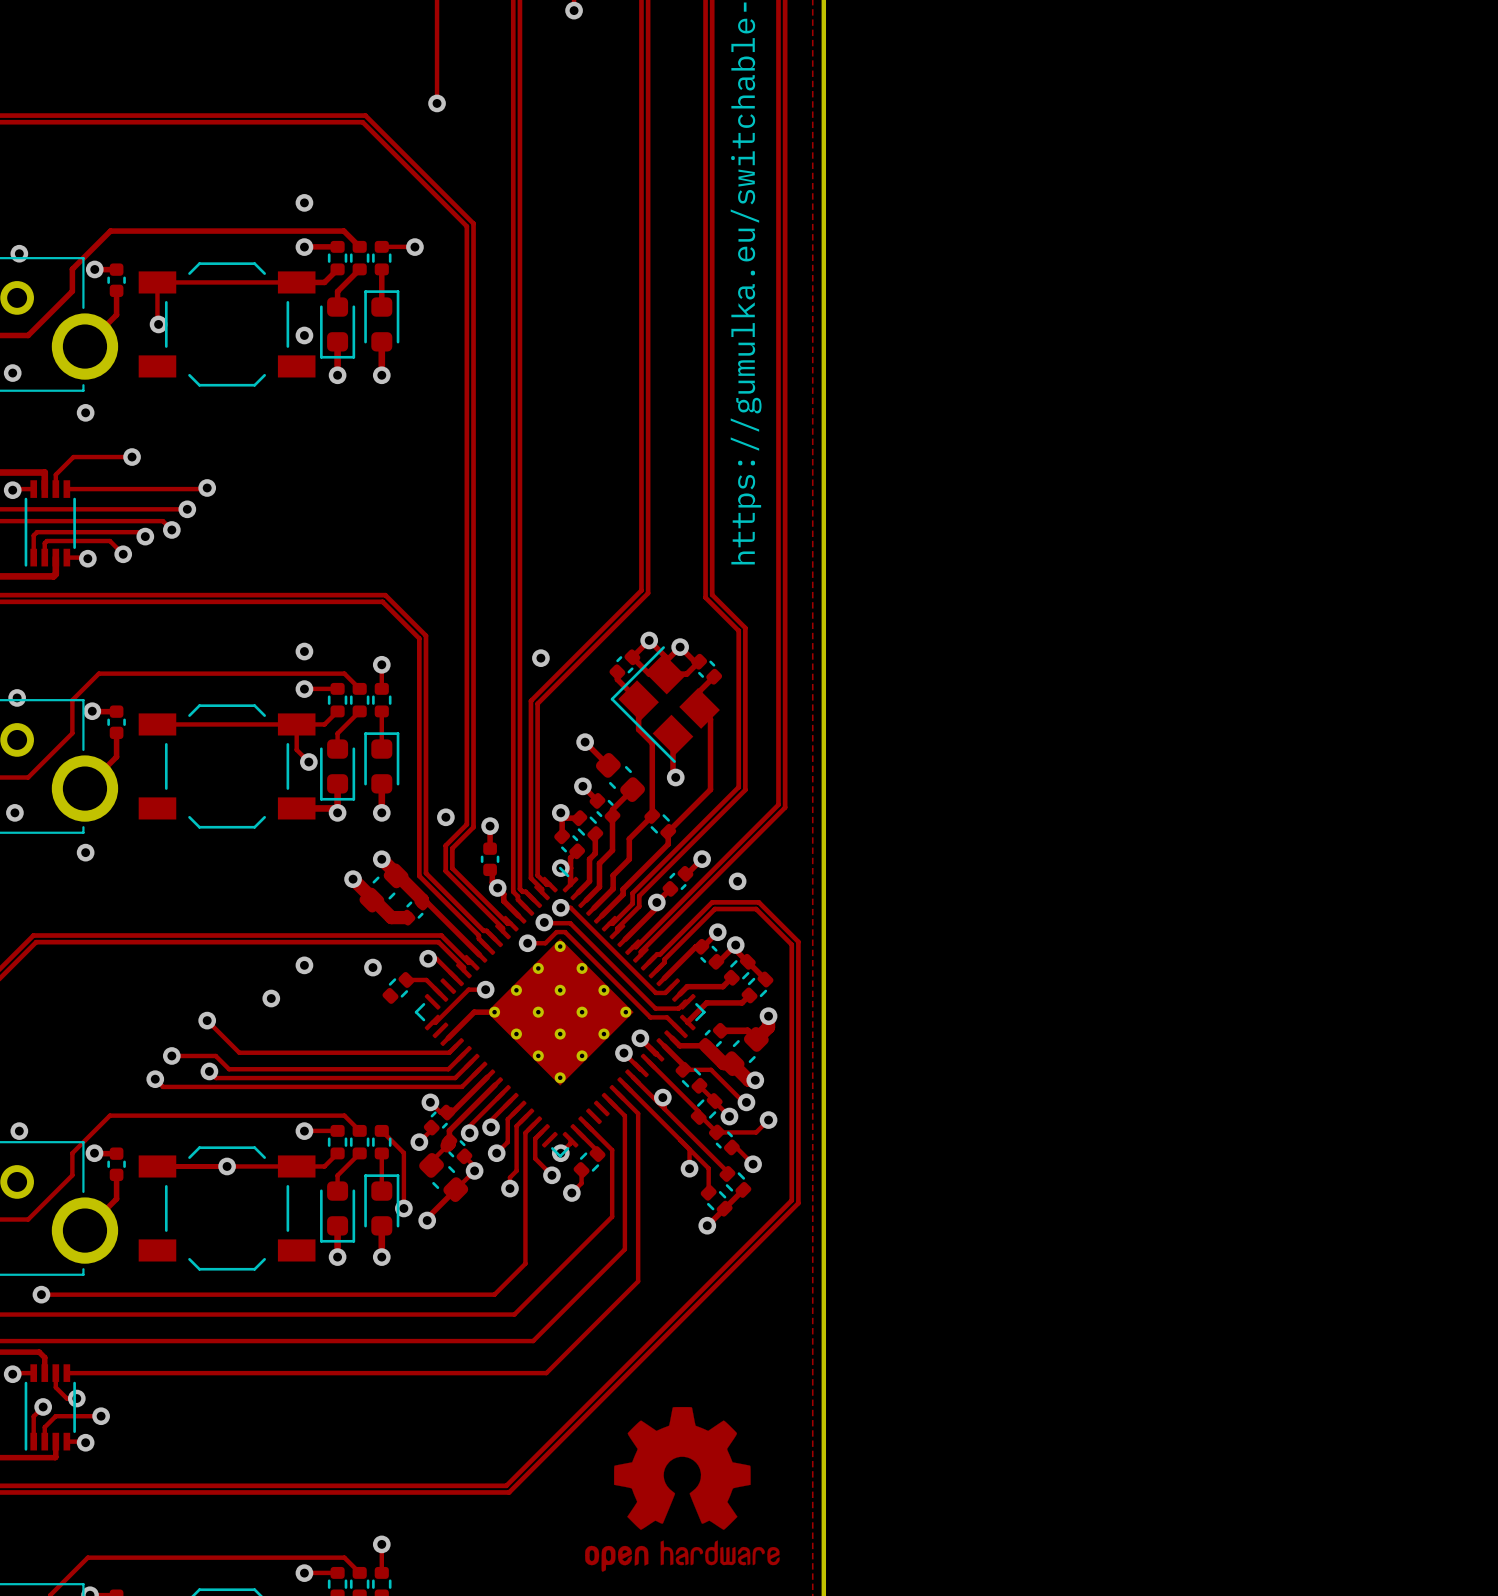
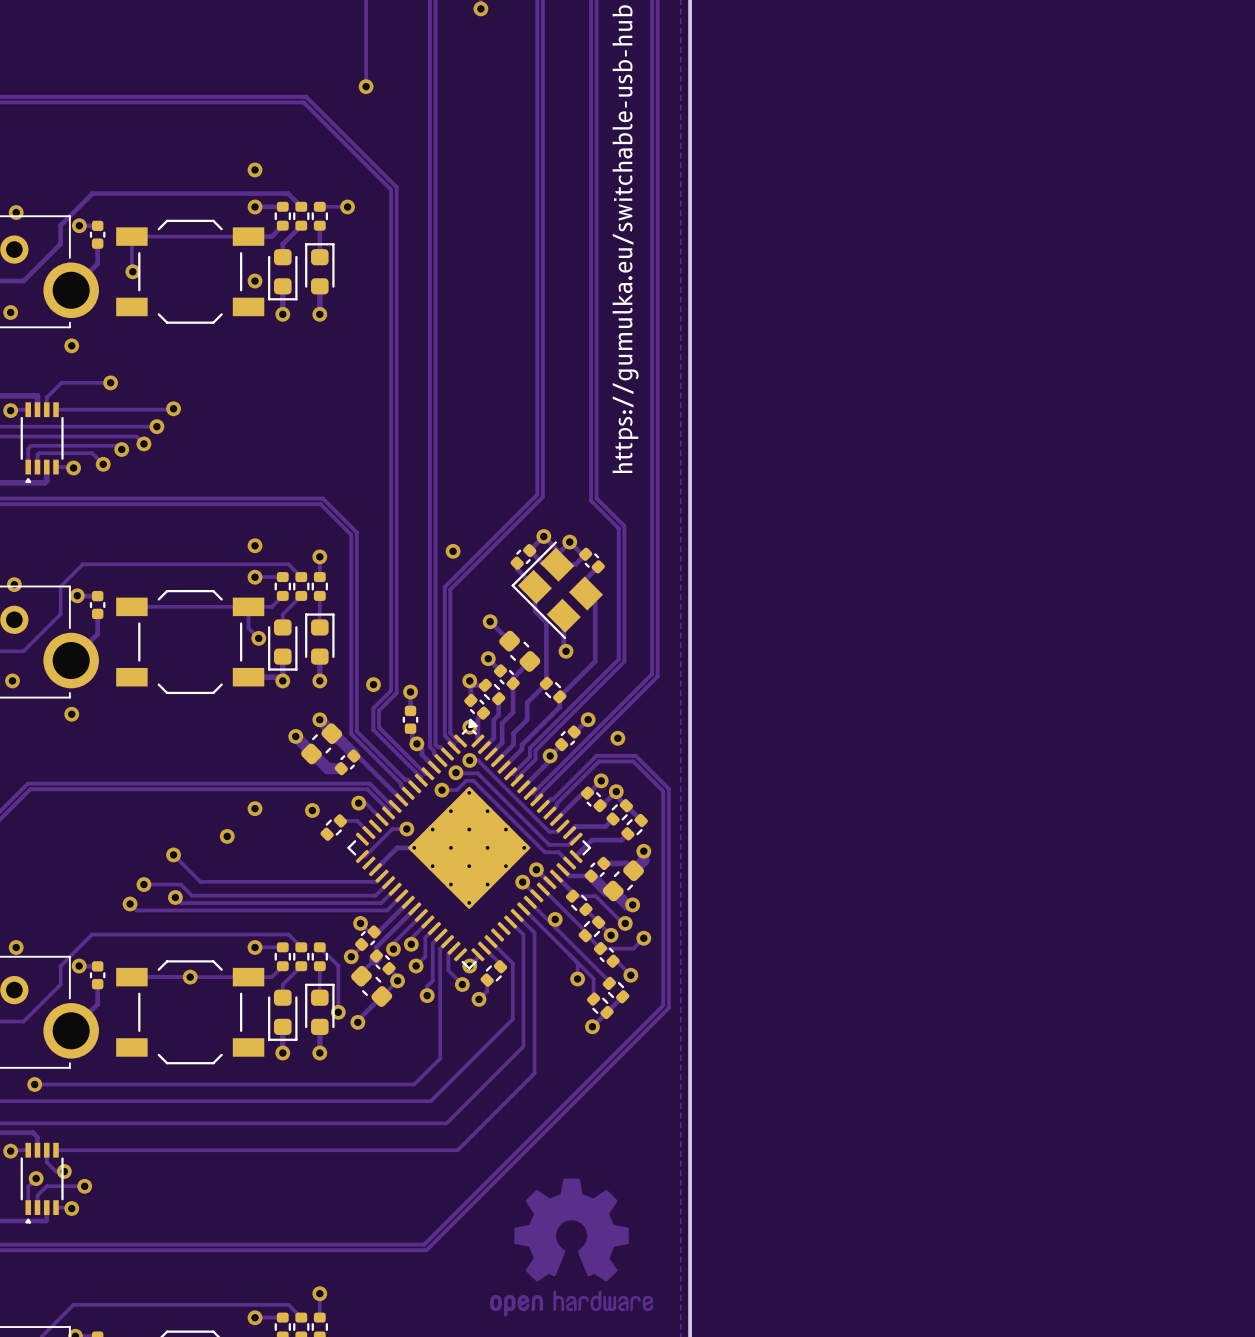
part footprint: [24, 480, 76, 567] -> [20, 402, 64, 484]
part footprint: [414, 866, 706, 1158] -> [347, 718, 592, 970]
part footprint: [24, 1364, 76, 1451] -> [20, 1142, 64, 1224]

